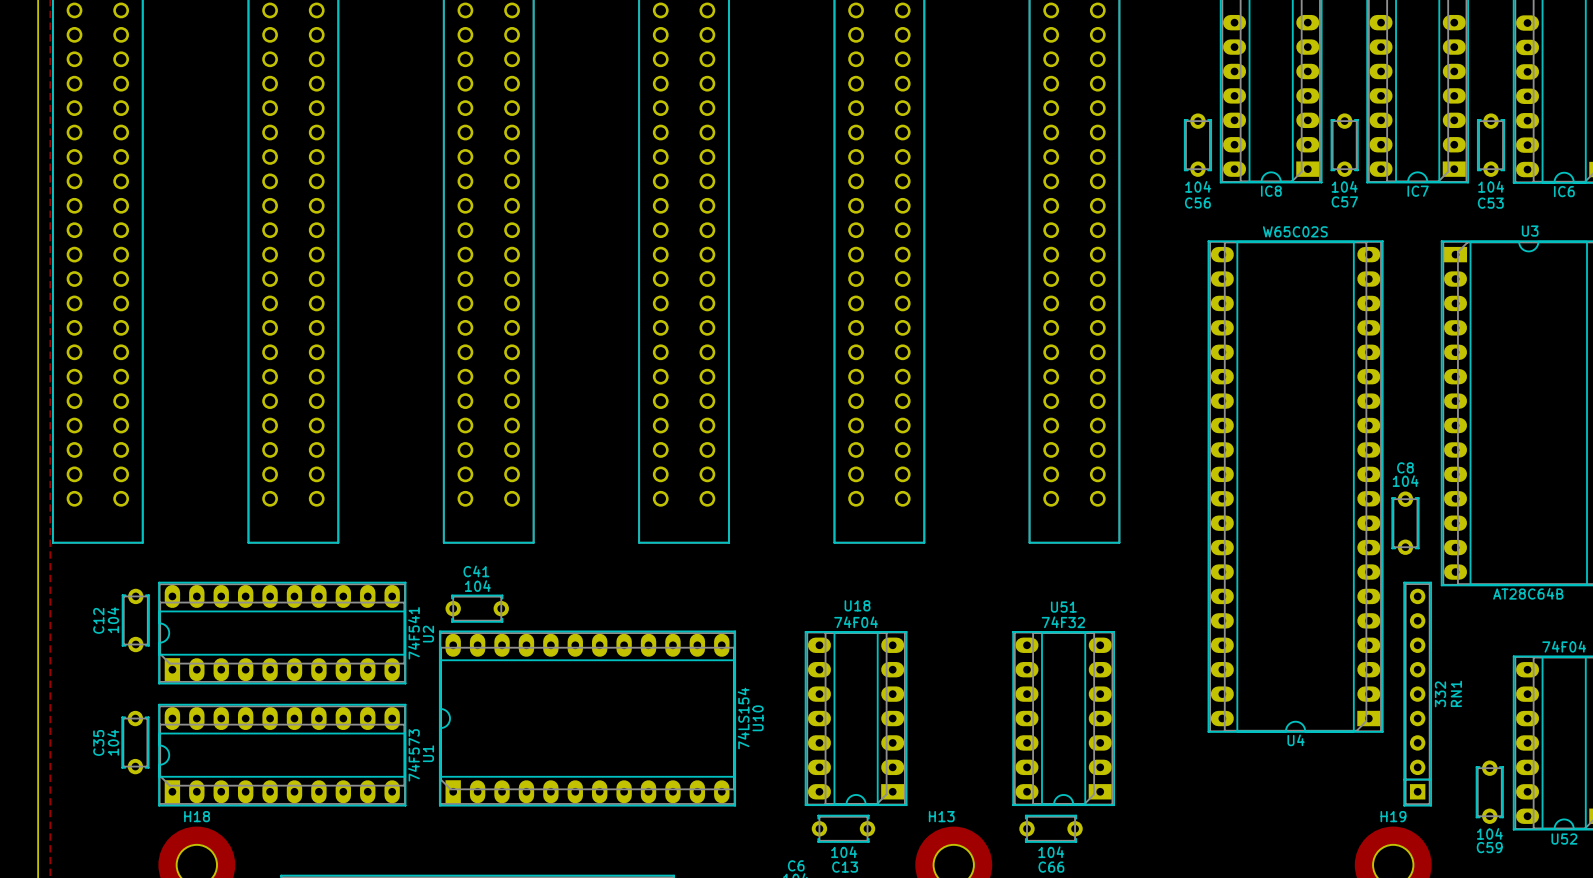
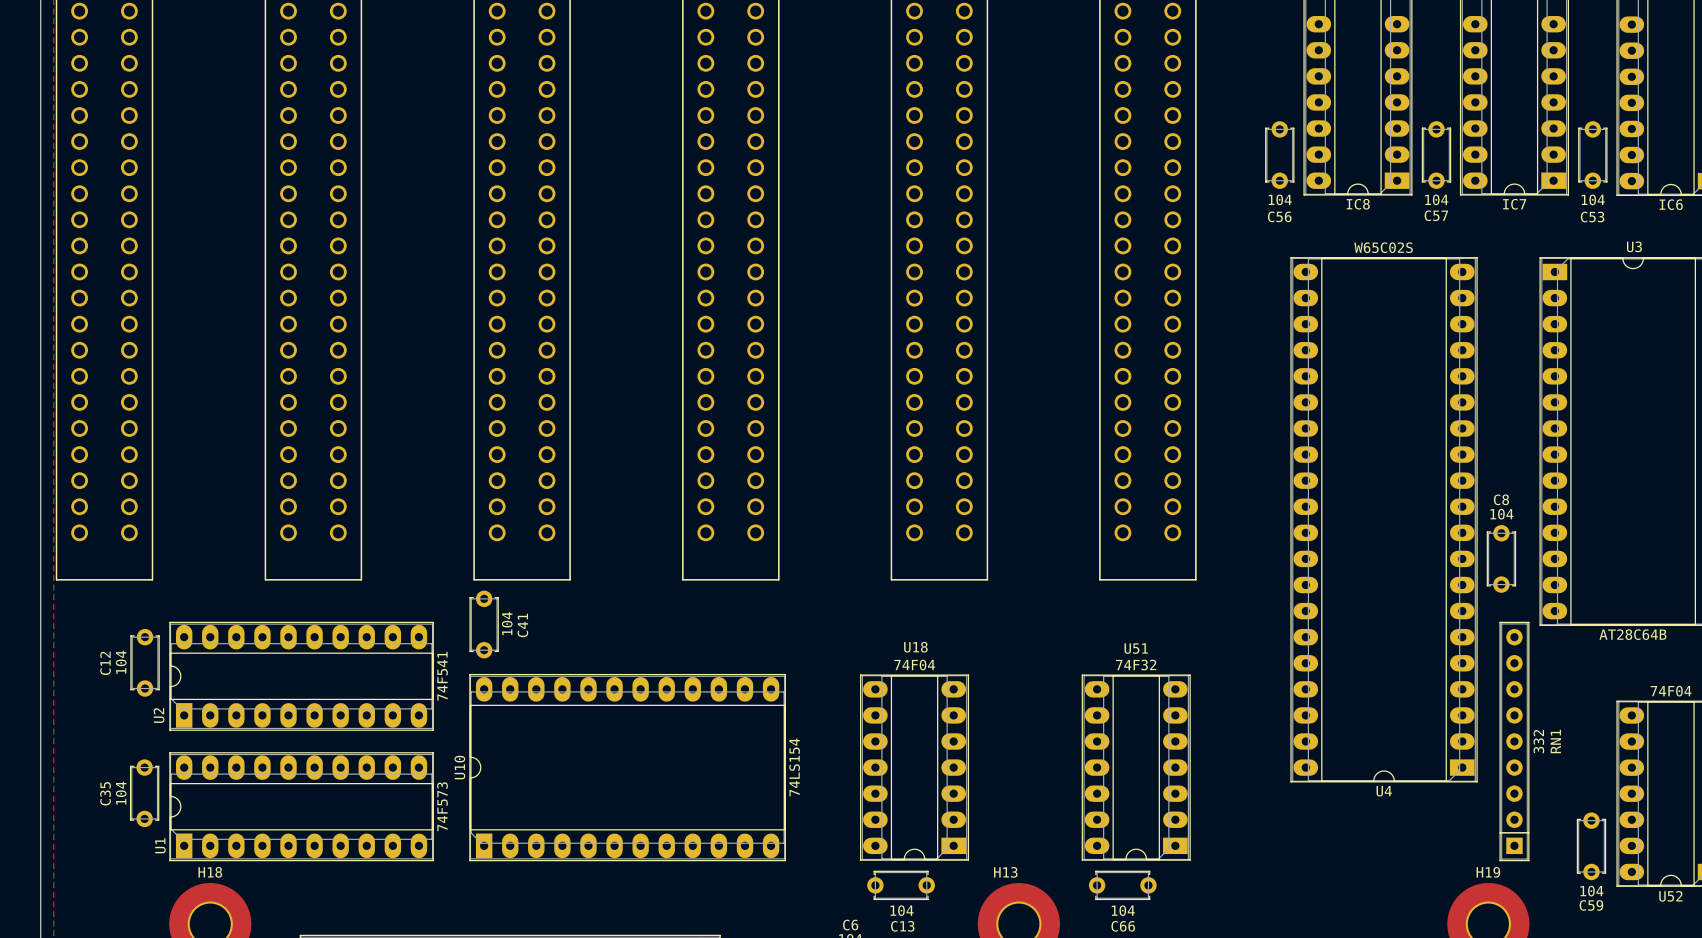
C41 rotation: 0° (477, 608) -> 90° clockwise (484, 624)
U2 name position: U2 (428, 634) -> U2 (159, 715)
U10 name position: U10 (758, 718) -> U10 (459, 767)
U1 name position: U1 (428, 753) -> U1 (160, 845)

